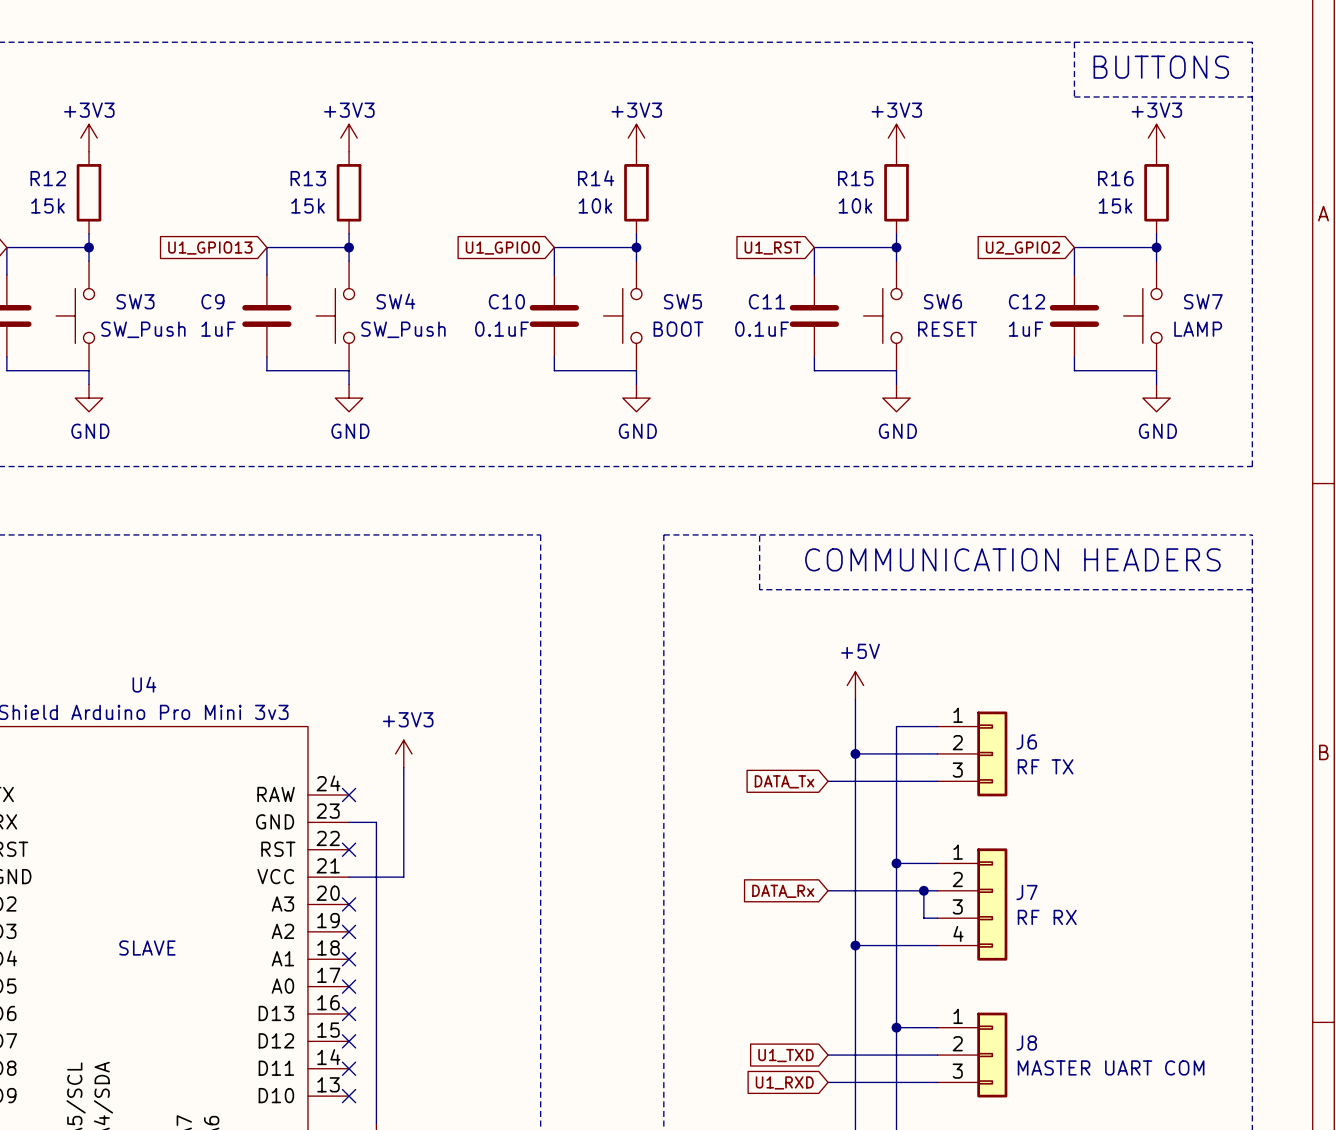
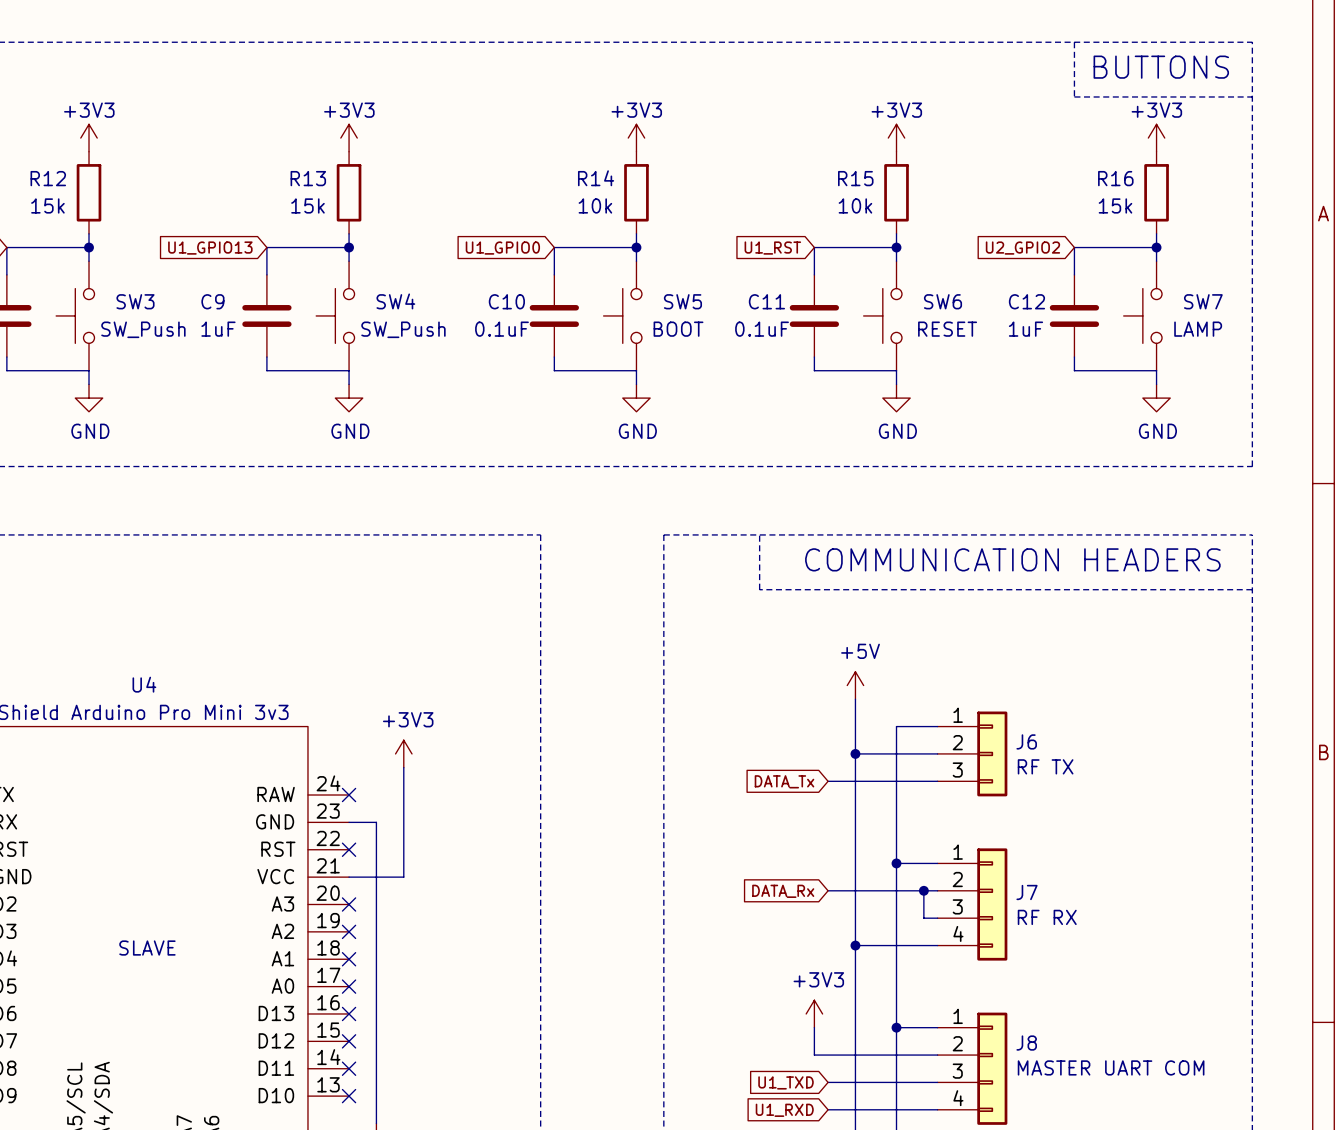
J8 symbol: [937, 1012, 1008, 1098] -> [937, 1012, 1008, 1125]
power symbol: none -> +3V3 (814, 1013)
wire: none -> (814, 1027) (814, 1055) (828, 1055)
global label: U1_TXD (786, 1055) -> none
global label: U1_RXD (784, 1082) -> U1_TXD (786, 1082)
wire: none -> (828, 1109) (937, 1109)
global label: none -> U1_RXD (784, 1110)

